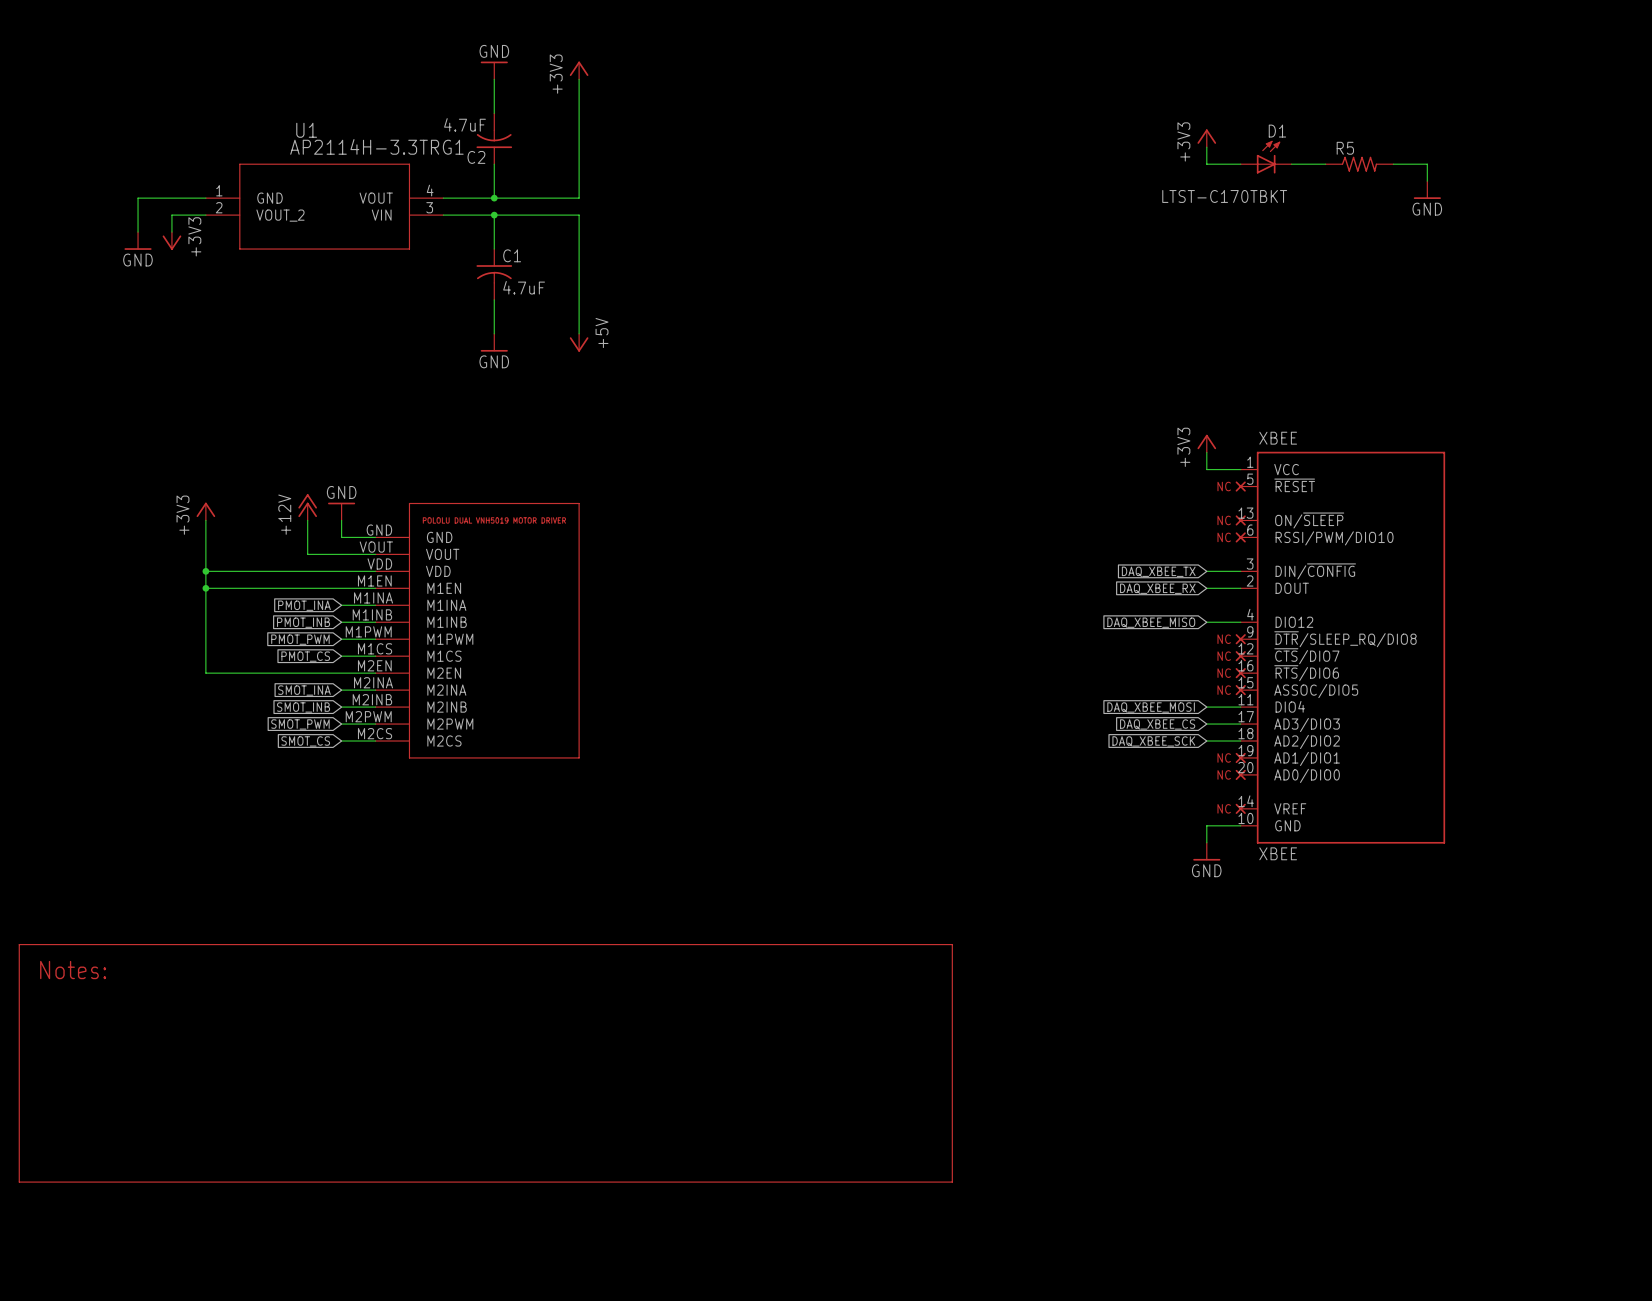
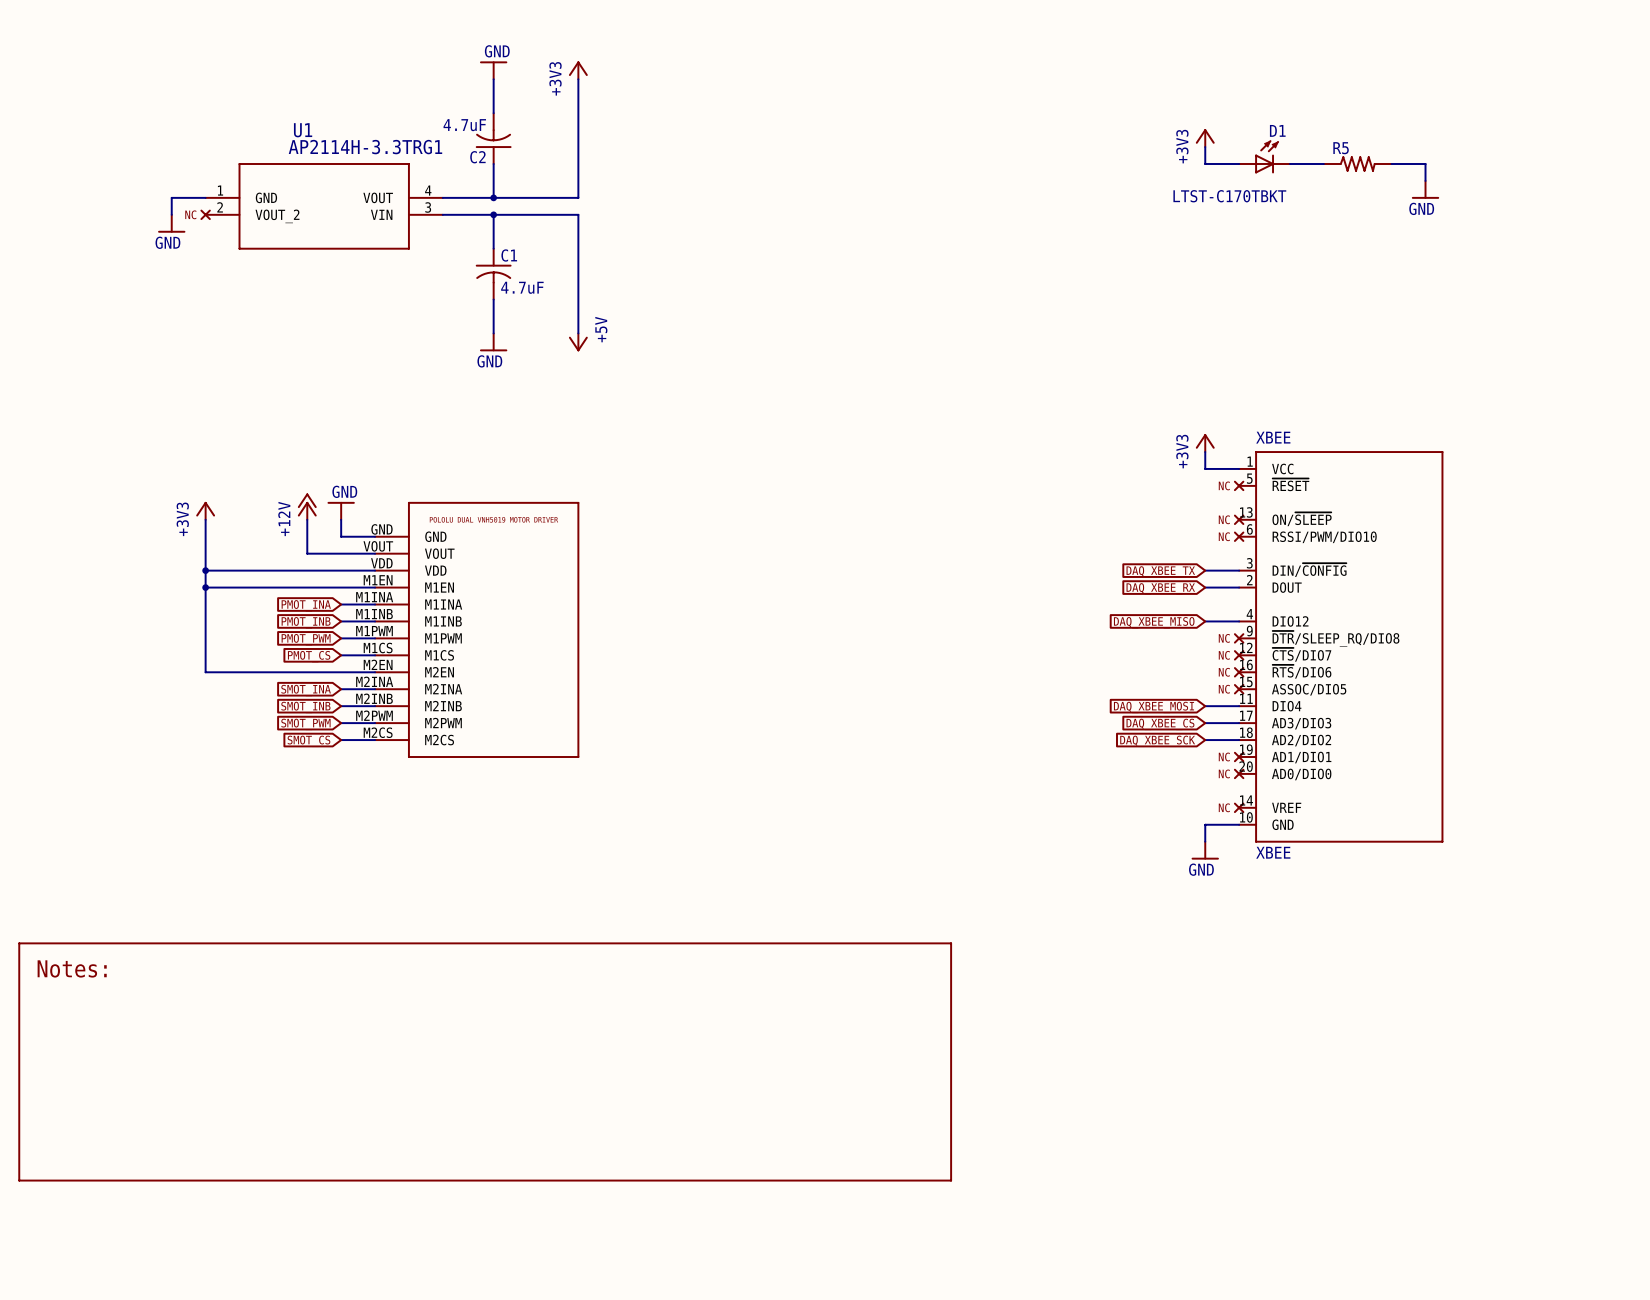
wire: (171, 198) (138, 198) (138, 232) -> (171, 197) (171, 214)
wire: (205, 215) (171, 215) (171, 232) -> none
part: none -> (205, 214)
power symbol position: GND (138, 240) -> GND (171, 223)
power symbol: +3V3 (171, 240) -> none

